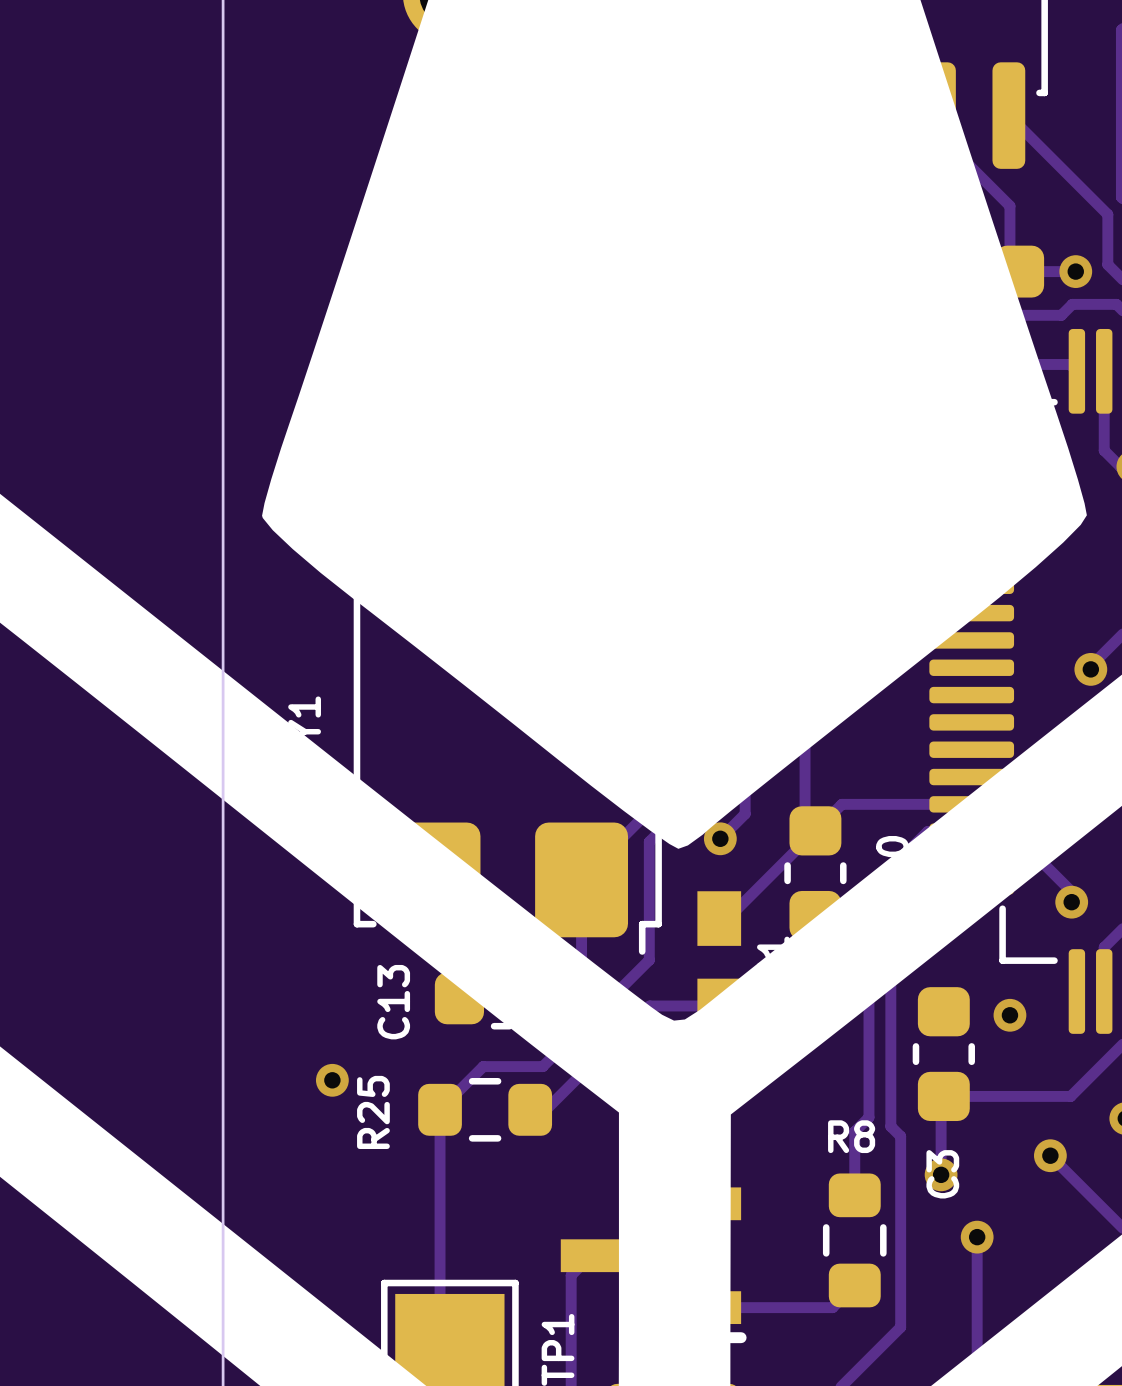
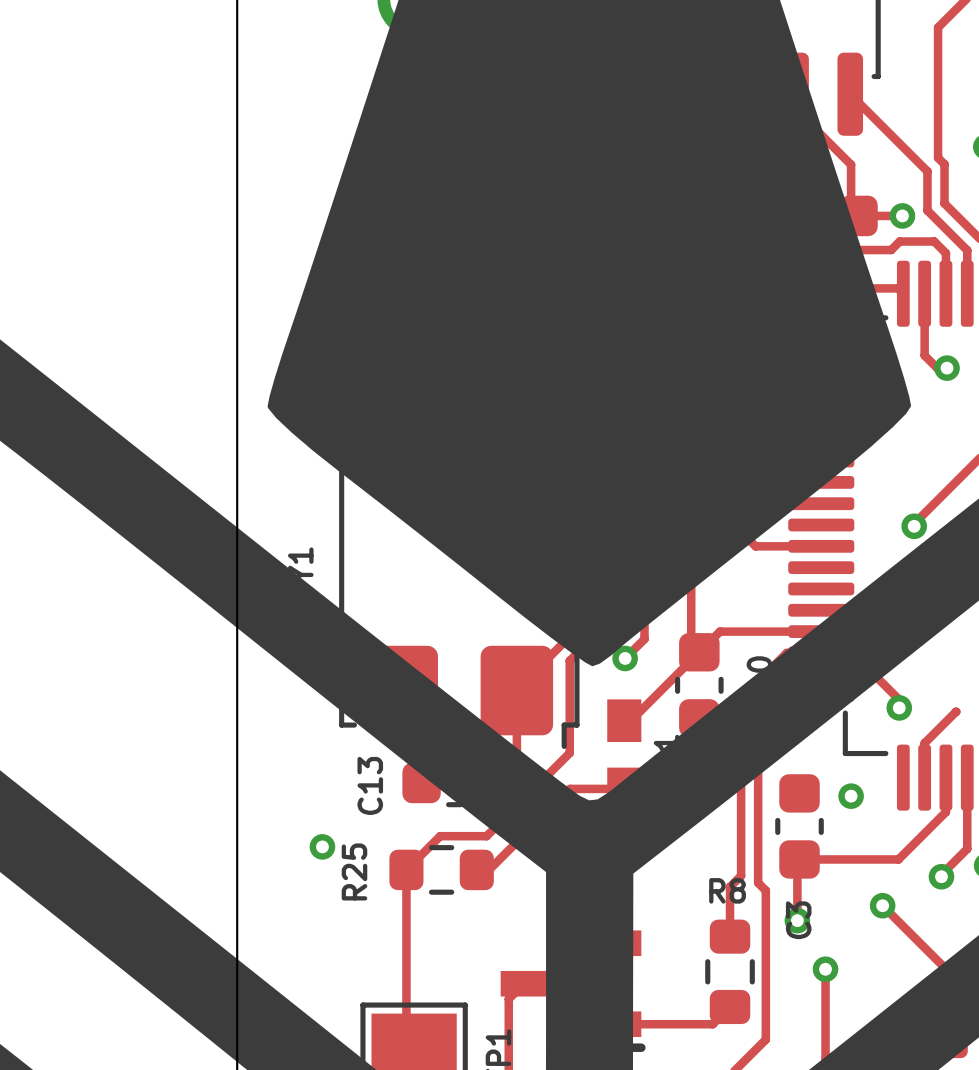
track: none -> (741, 529) (741, 532) (755, 546) (821, 546)

